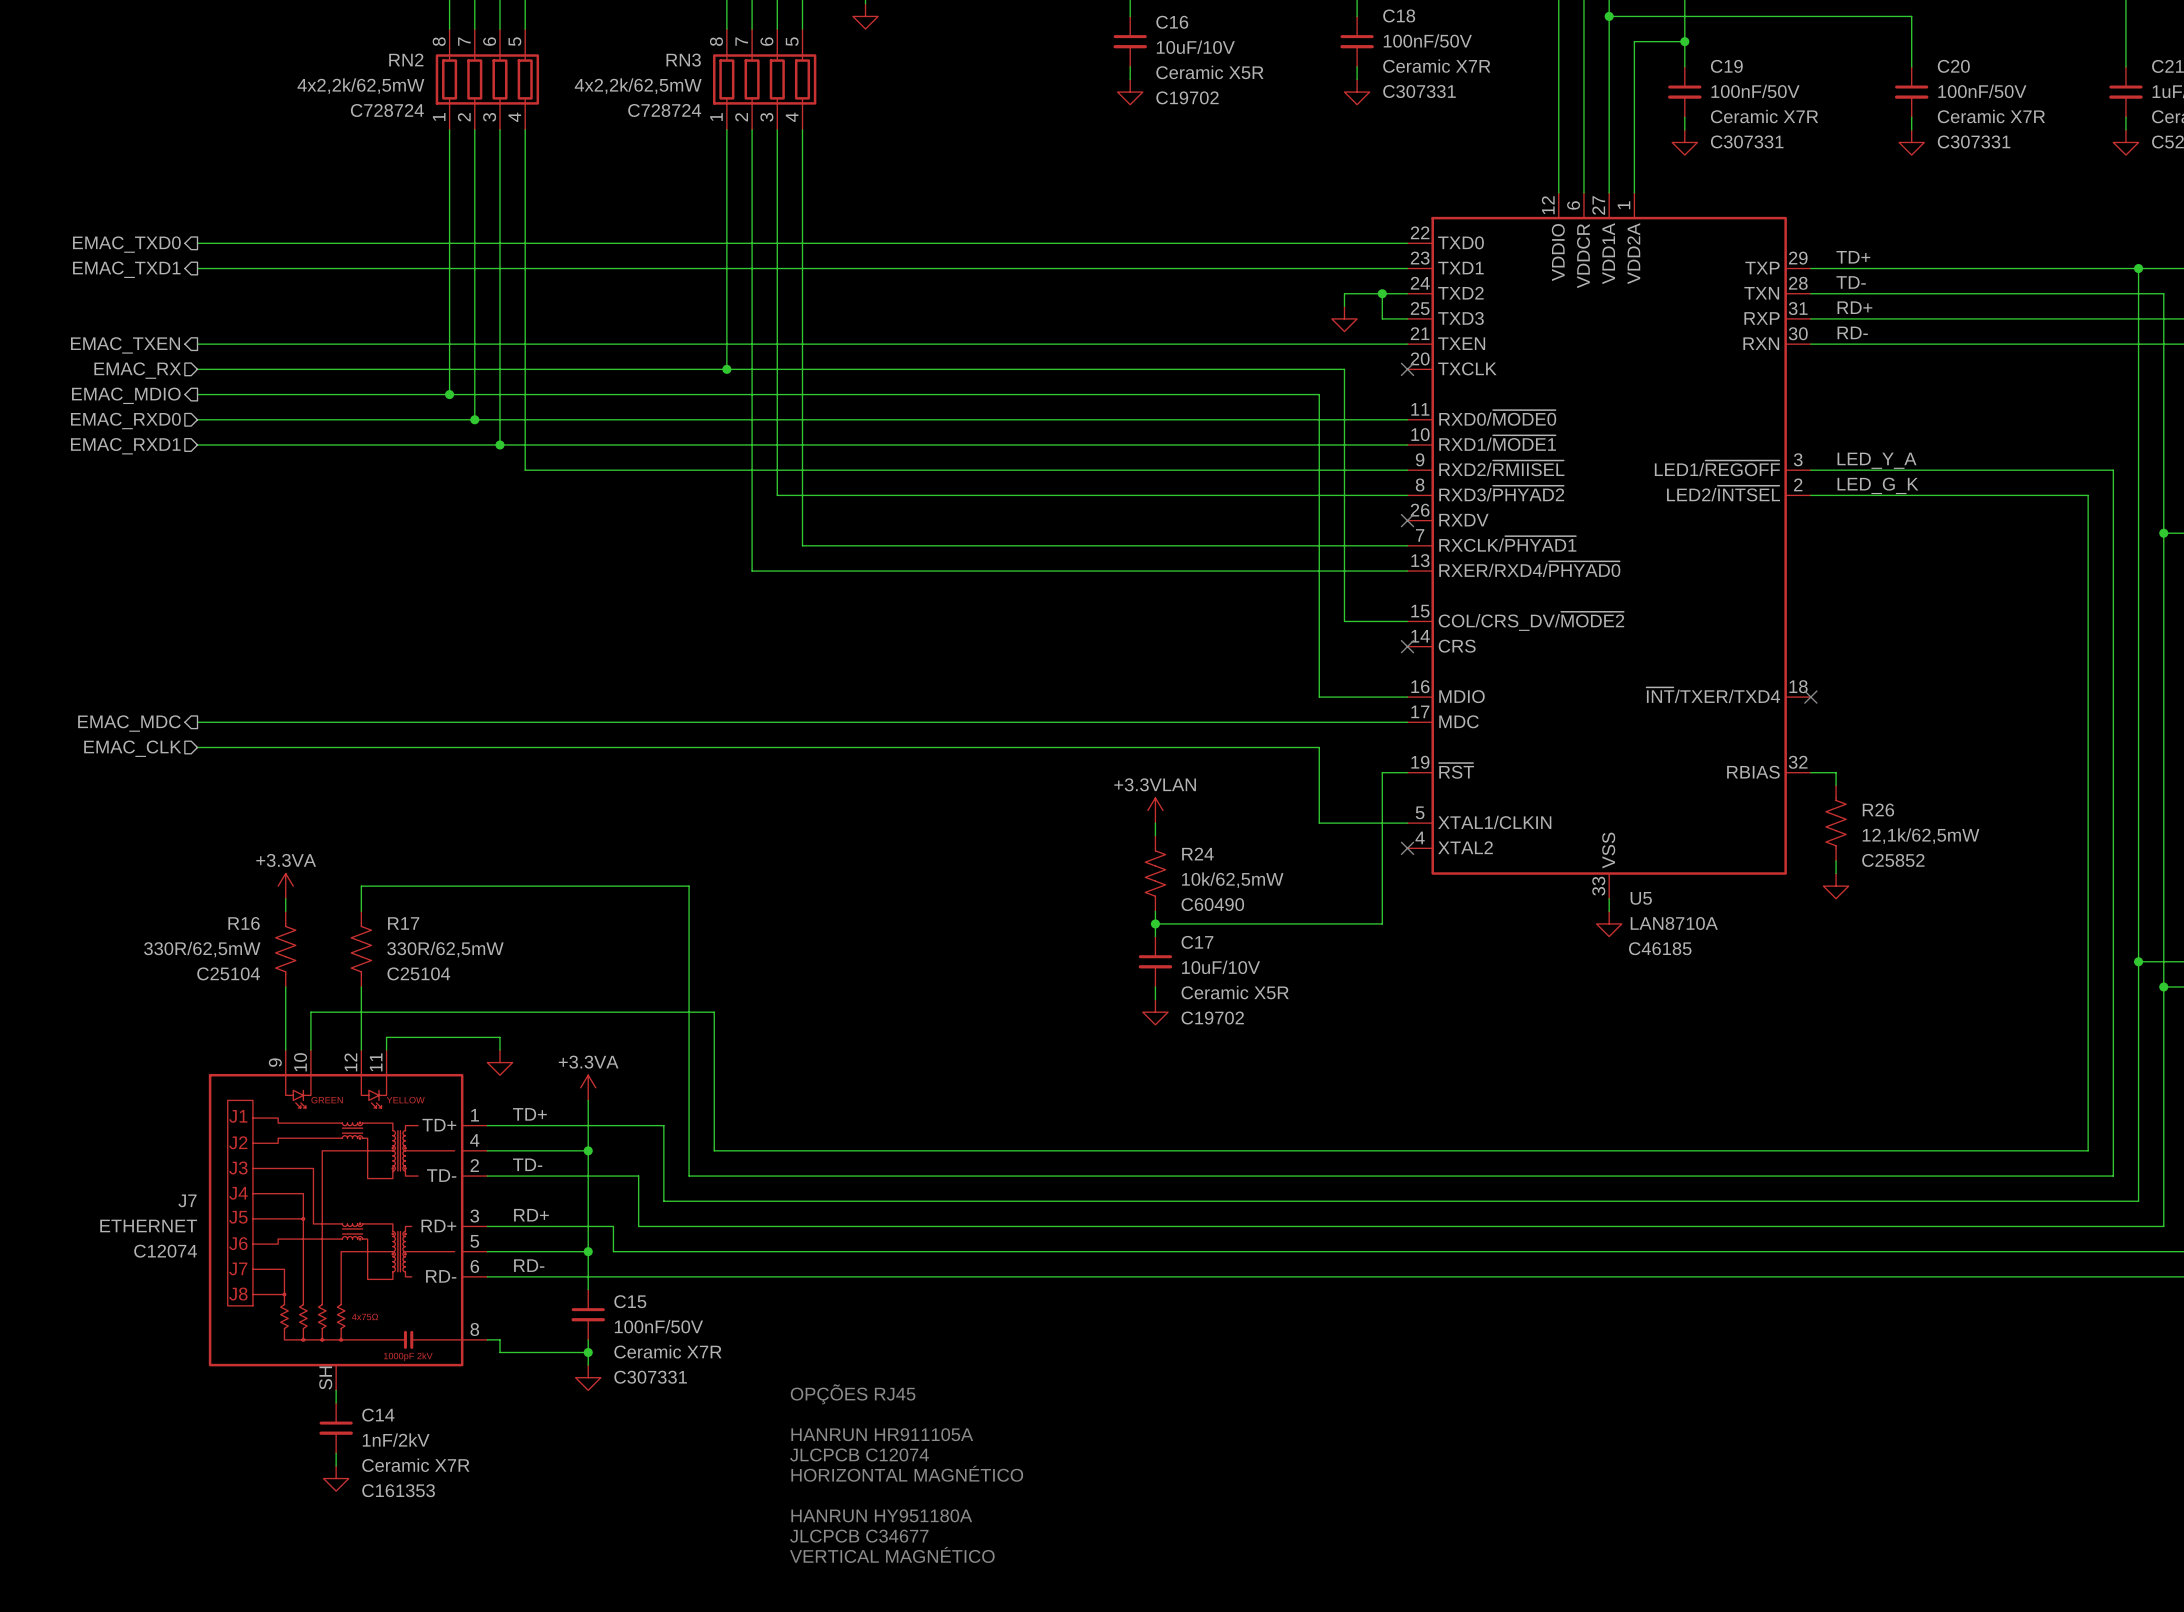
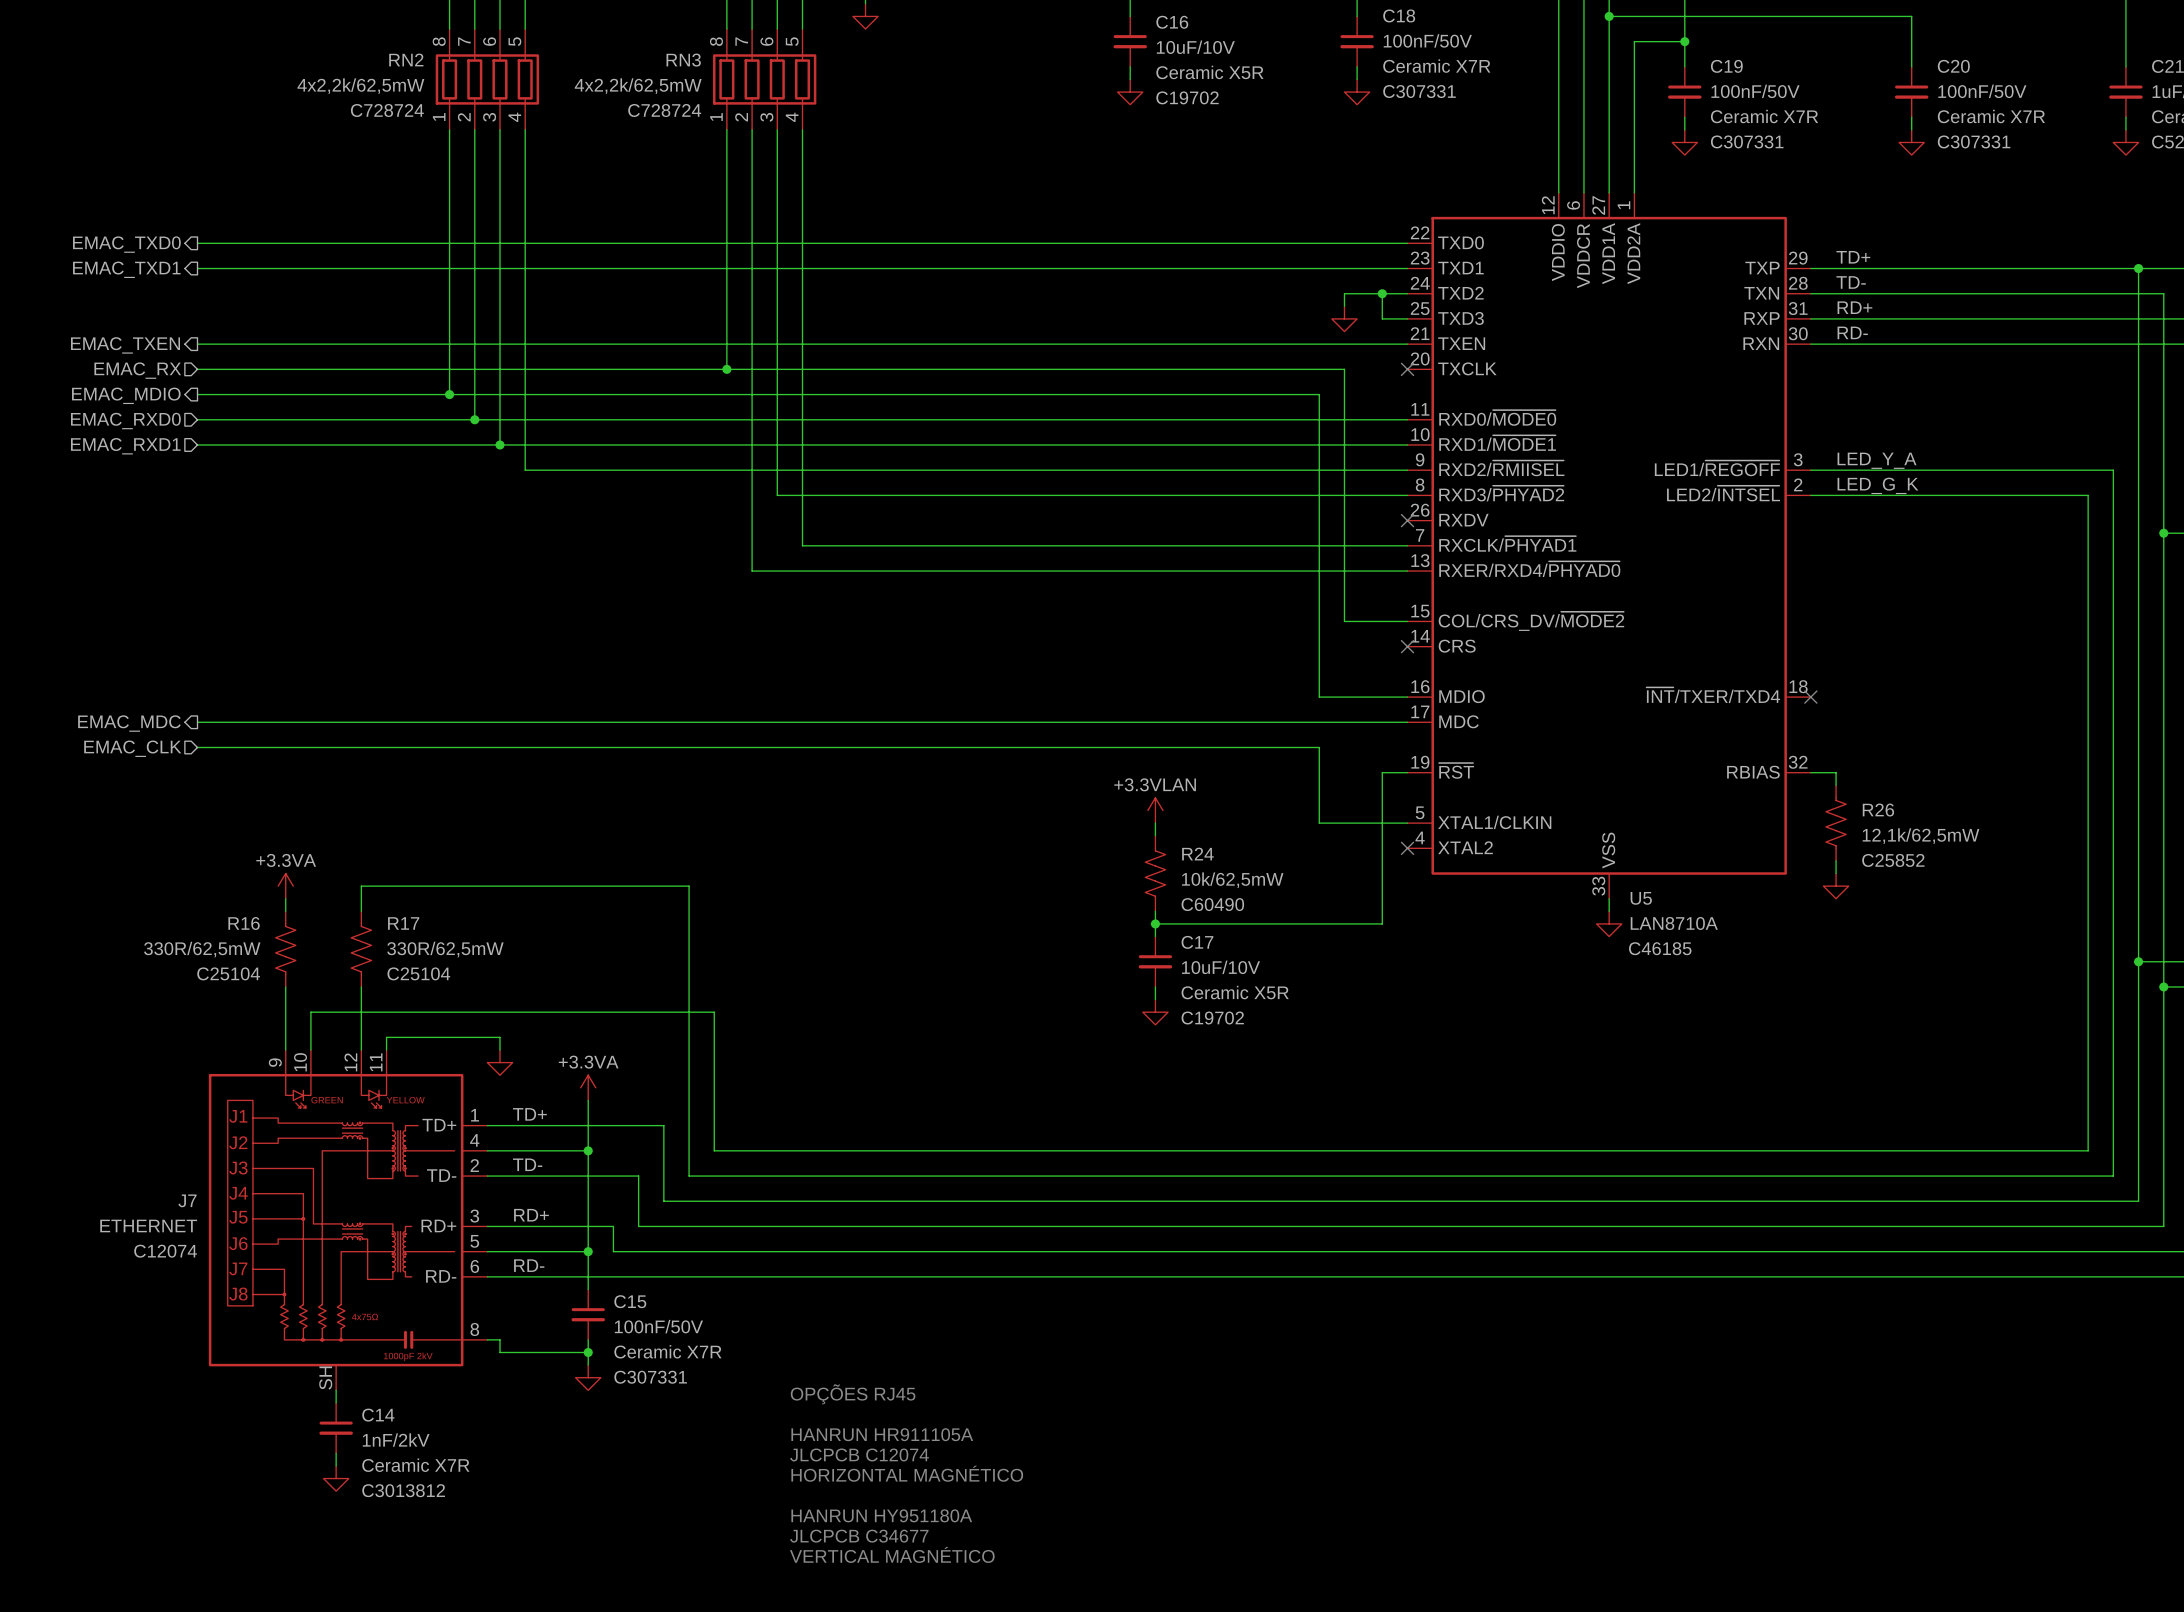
C14 text: C161353 (398, 1490) -> C3013812 (403, 1490)

